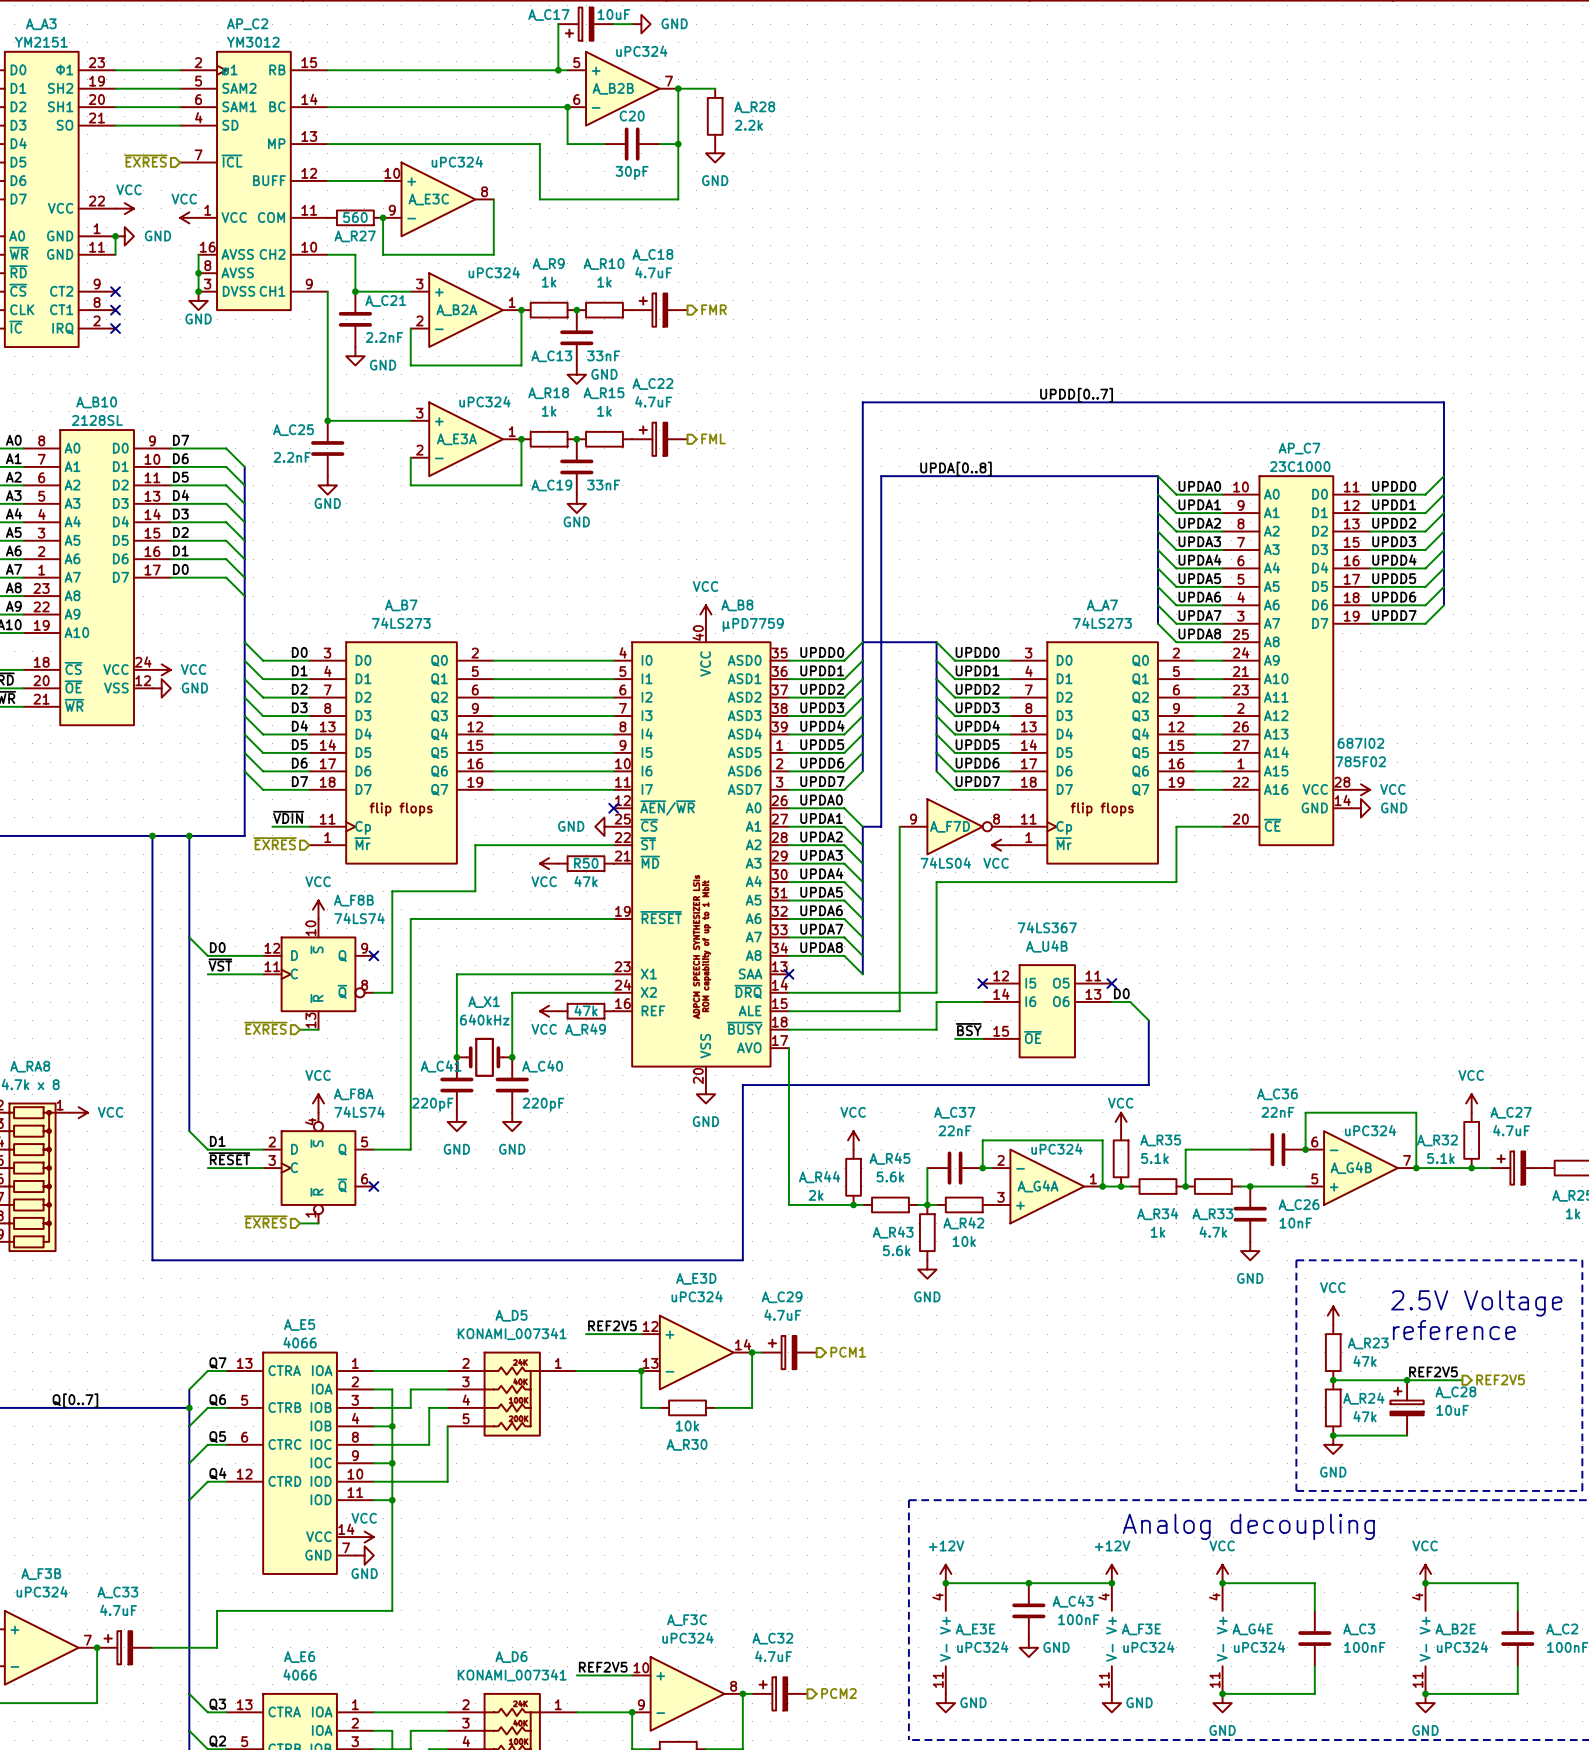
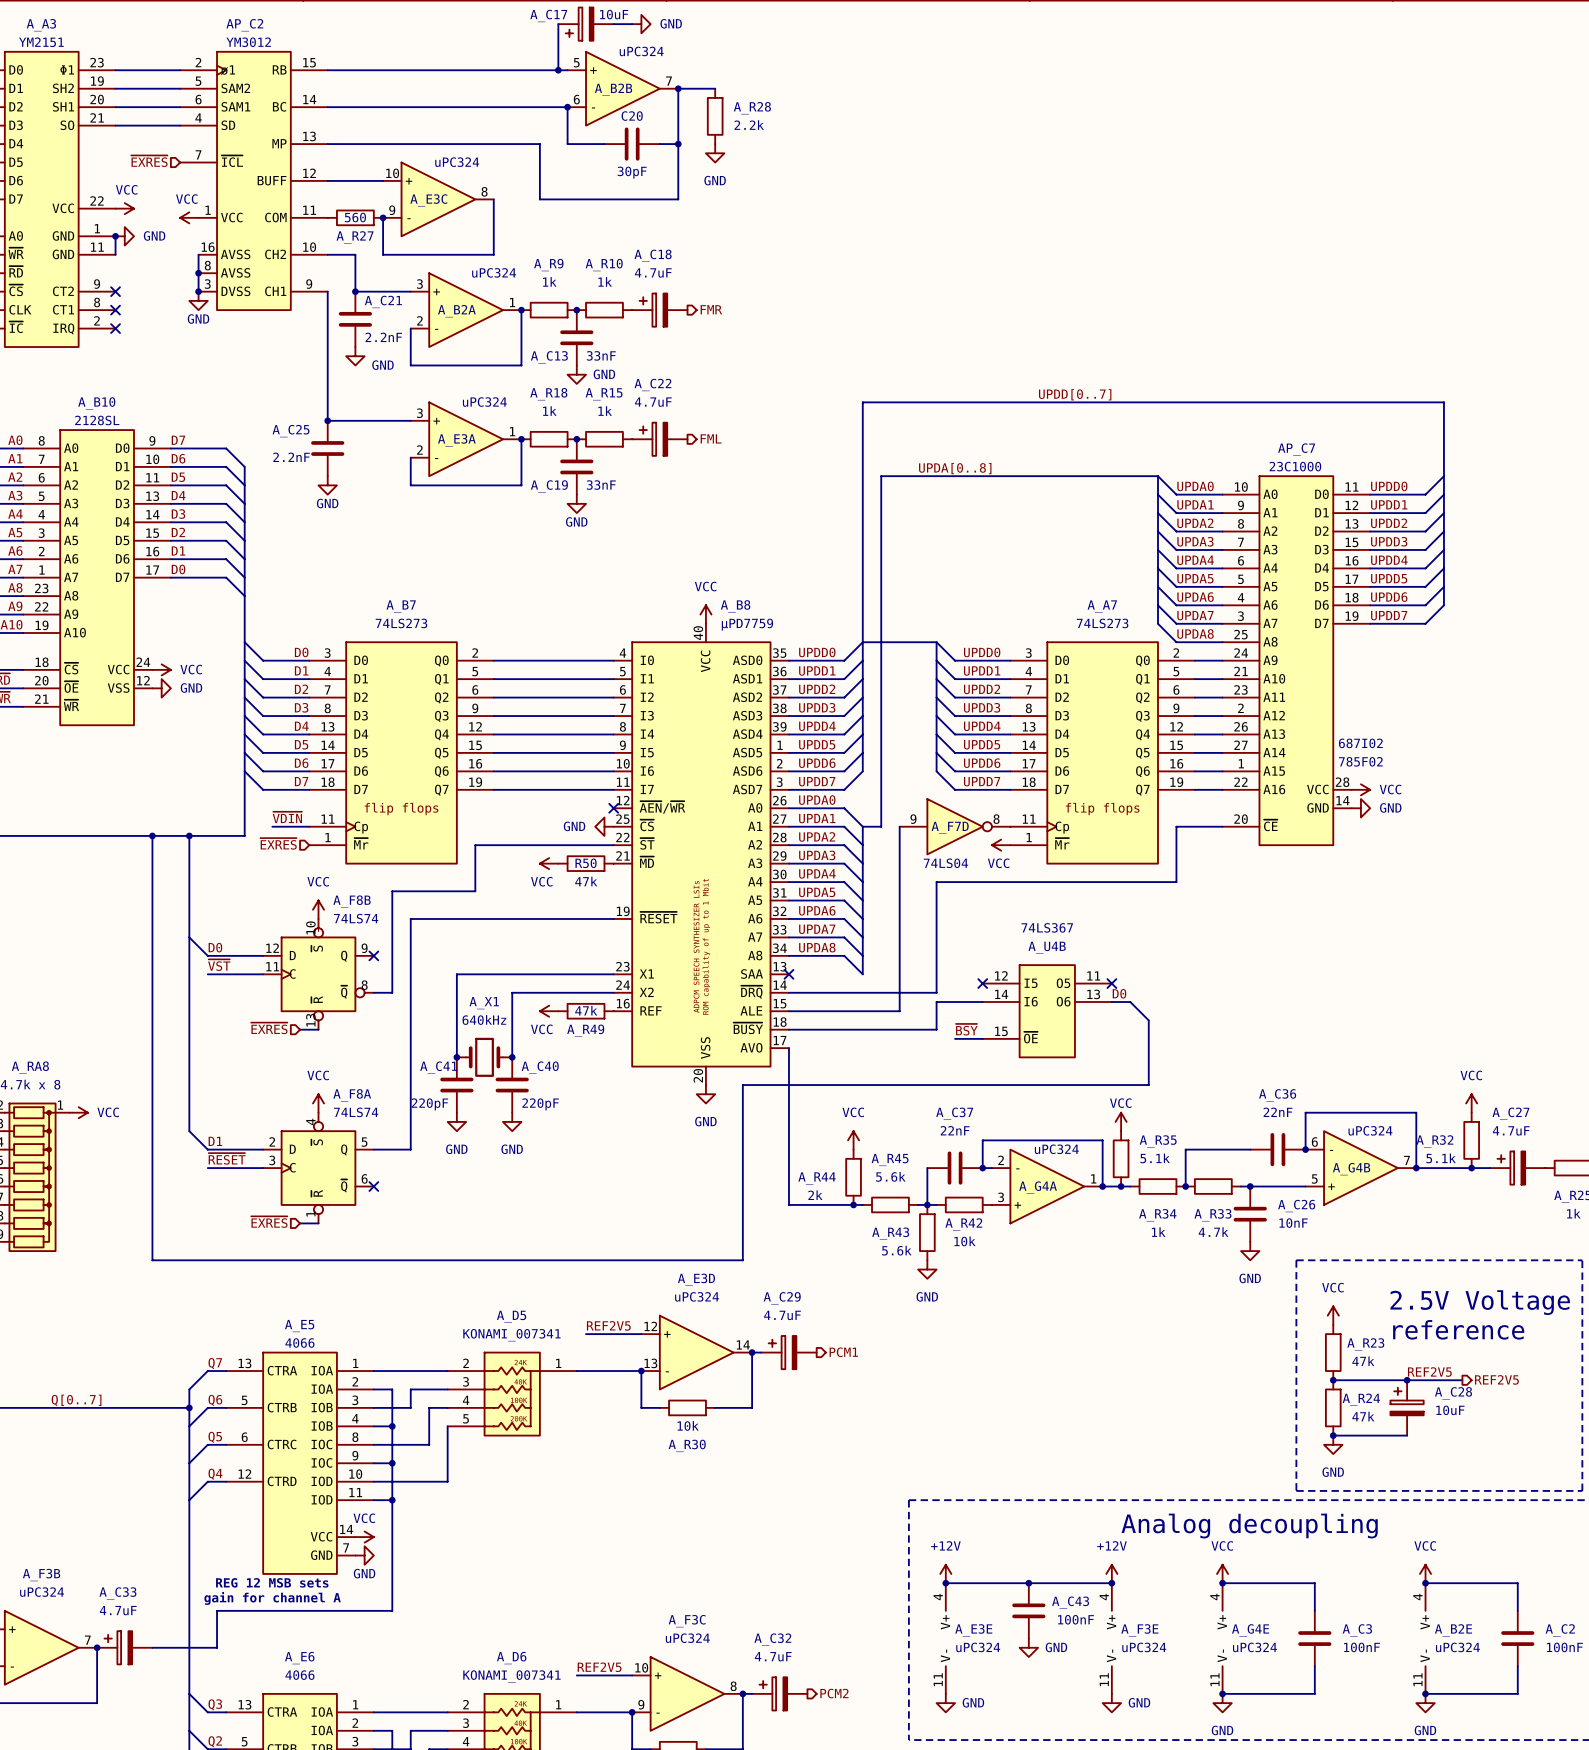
A_F8B symbol: [263, 918, 374, 1030] -> [263, 918, 374, 1030]
text: none -> REG 12 MSB sets (272, 1582)
text: none -> gain for channel A (272, 1598)

